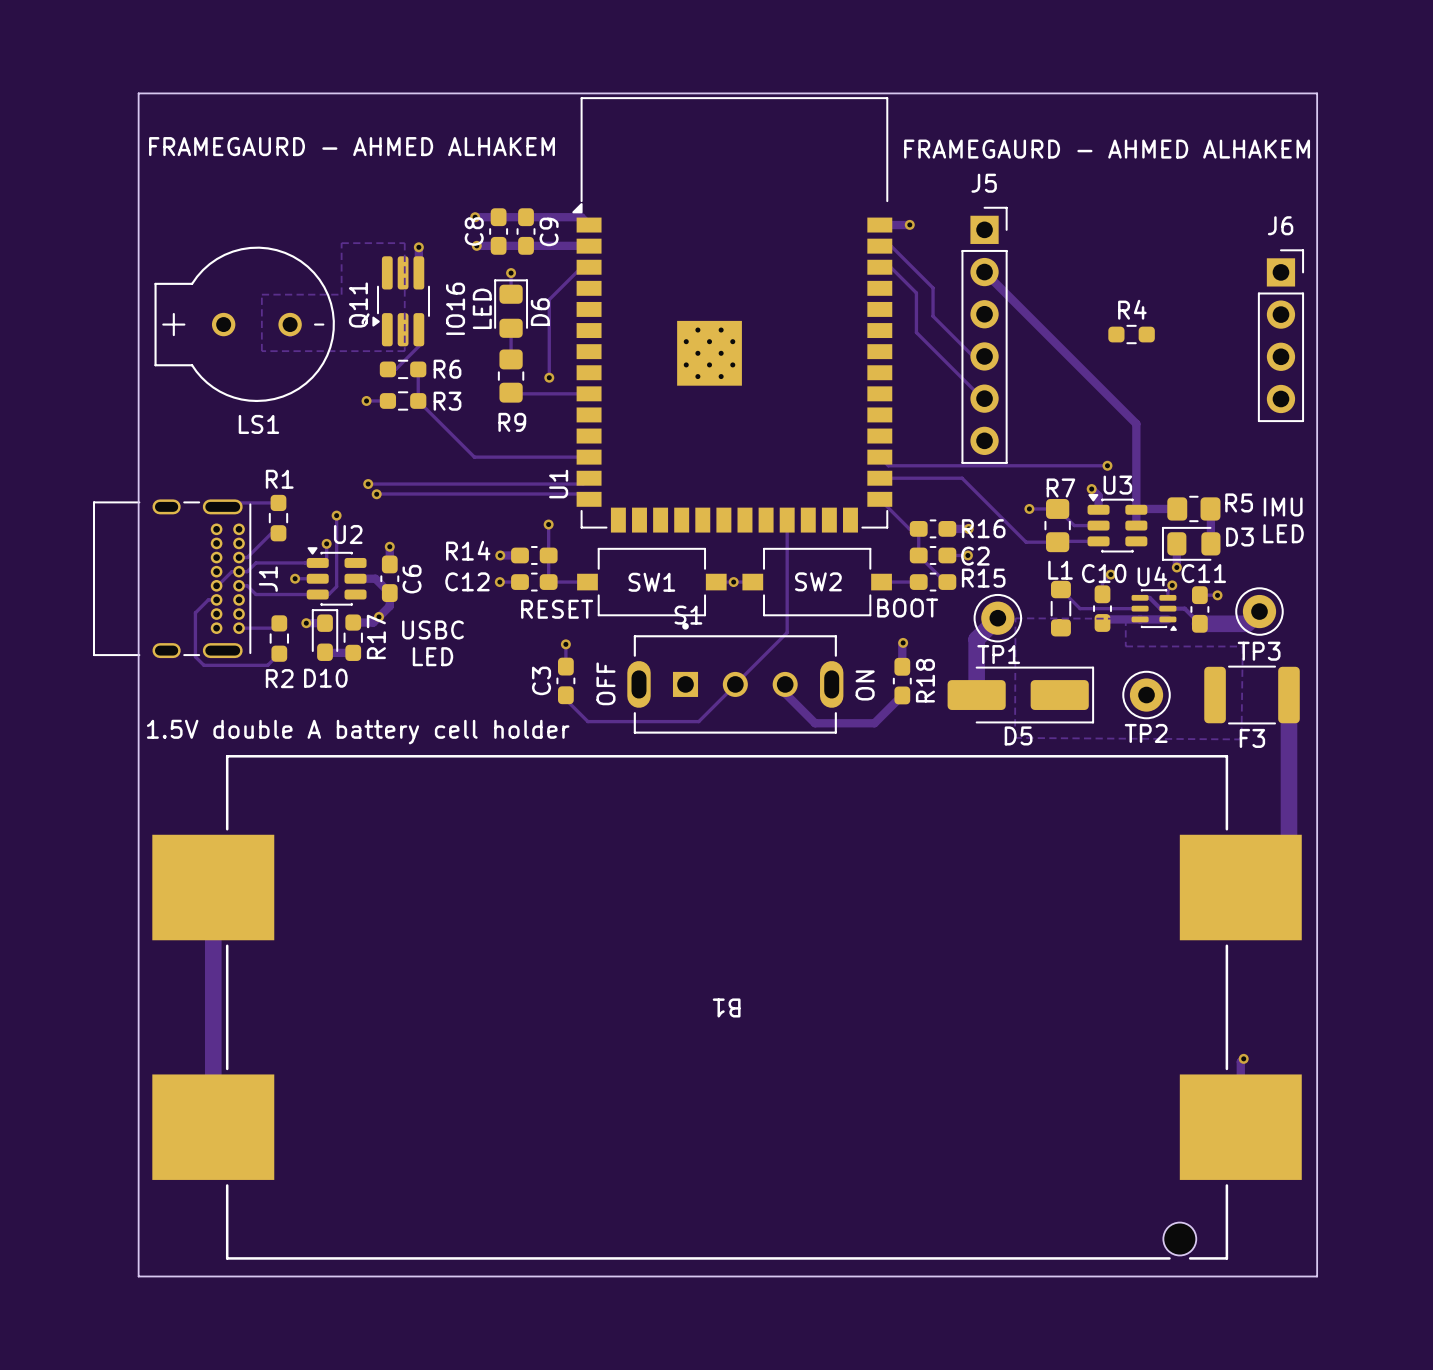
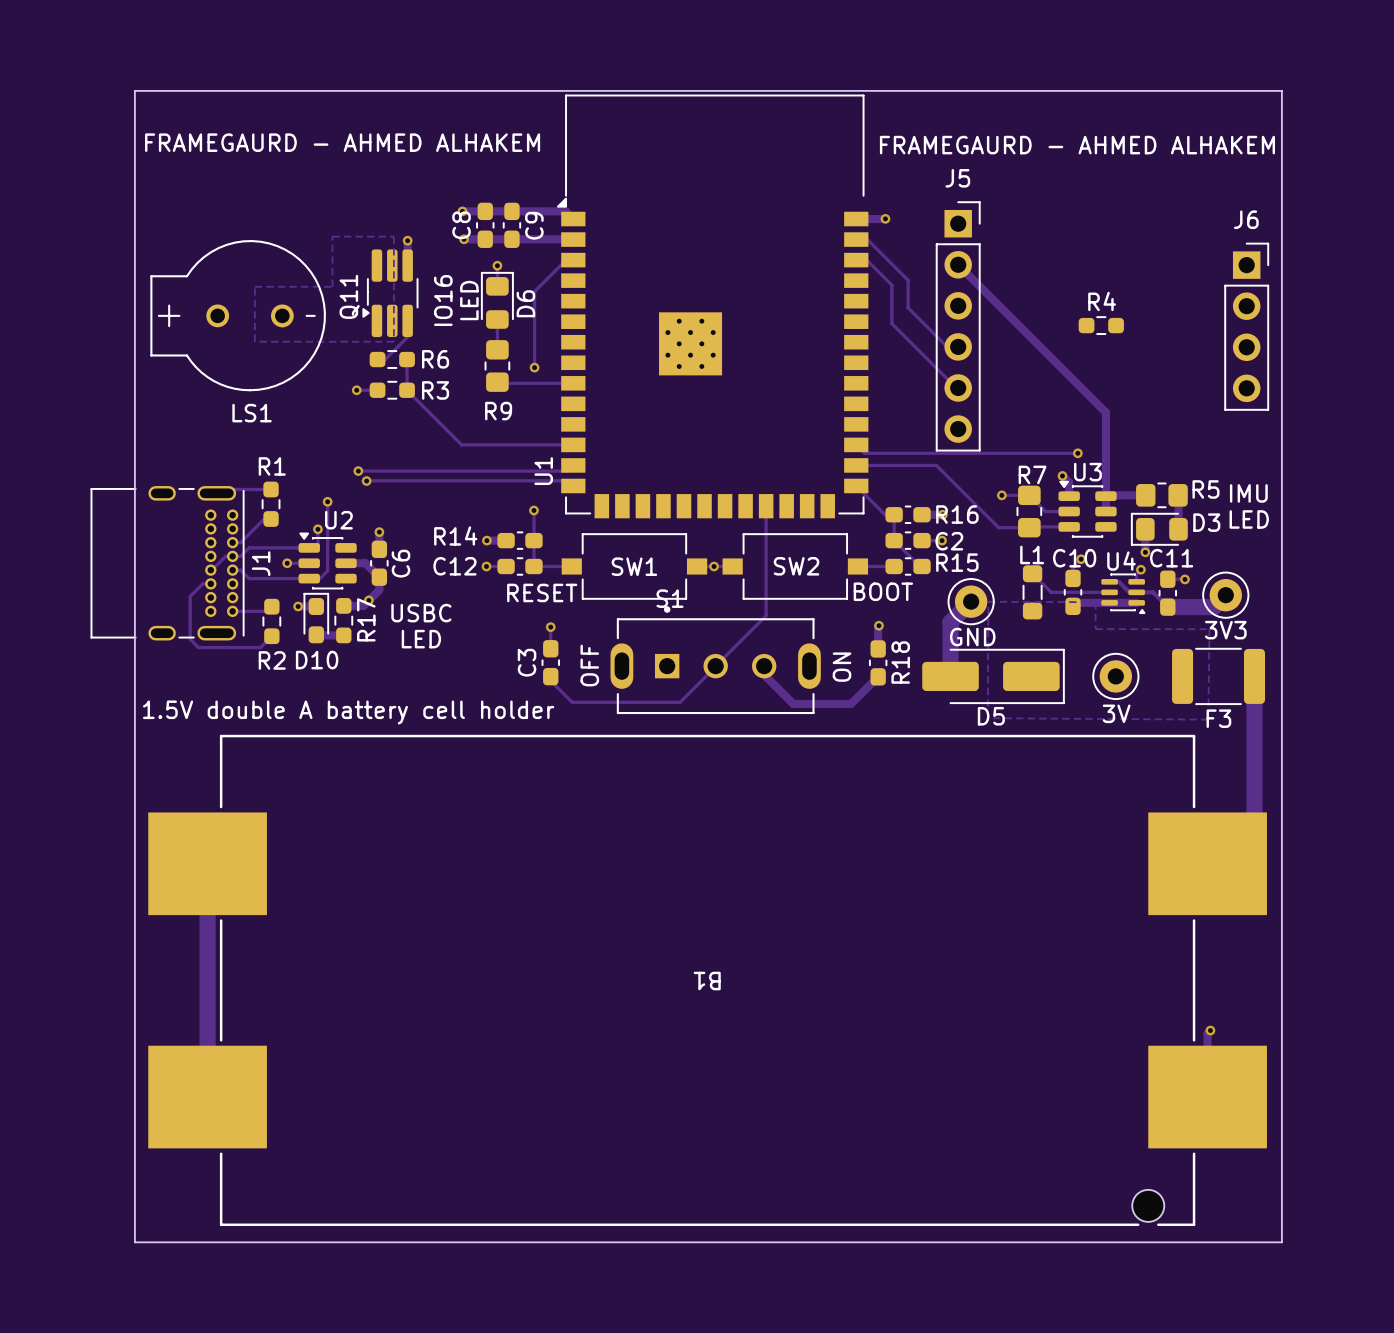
TP3 name: TP3 (1259, 651) -> 3V3 (1225, 630)
TP1 name: TP1 (998, 654) -> GND (972, 637)
TP2 name: TP2 (1146, 733) -> 3V (1116, 713)

